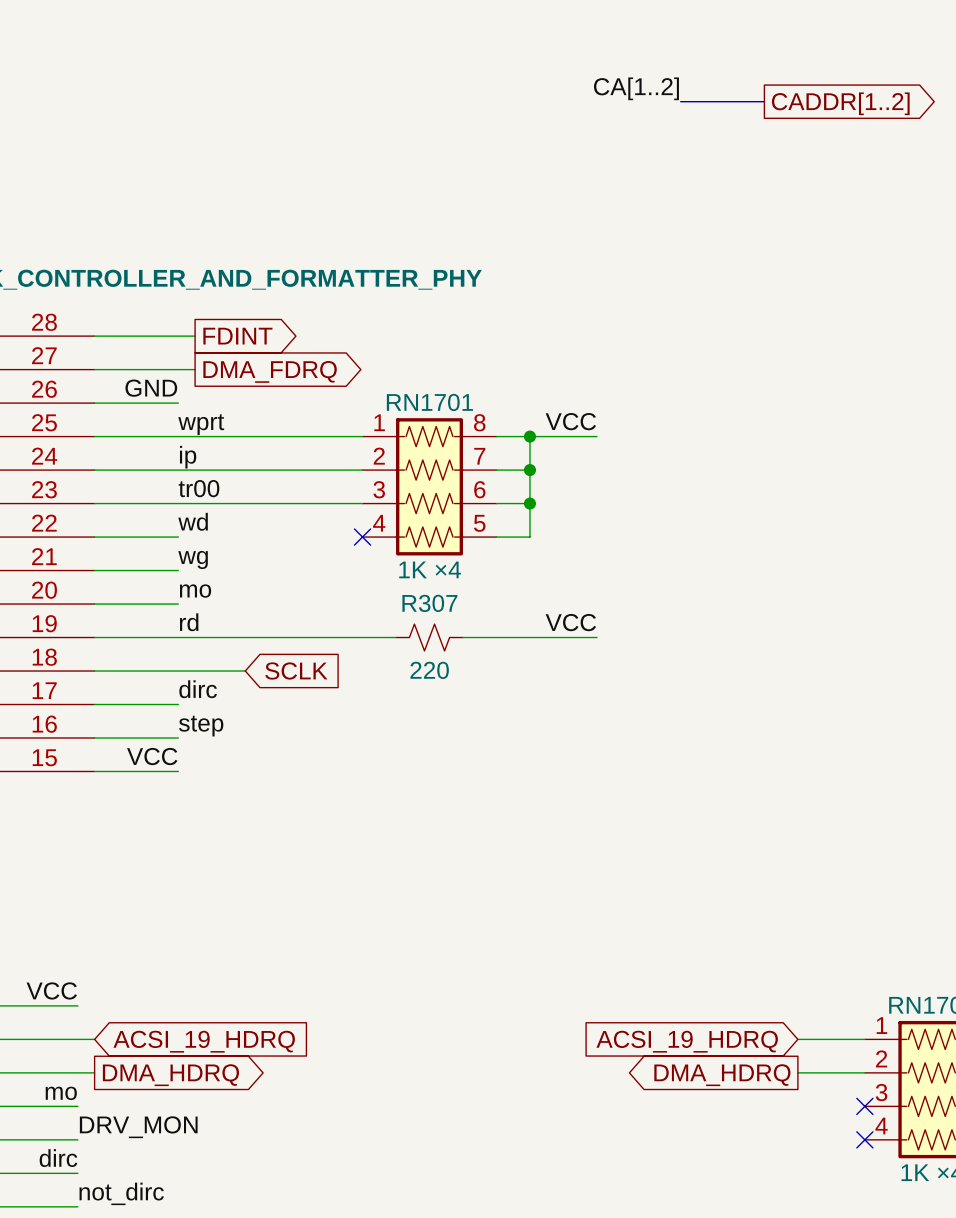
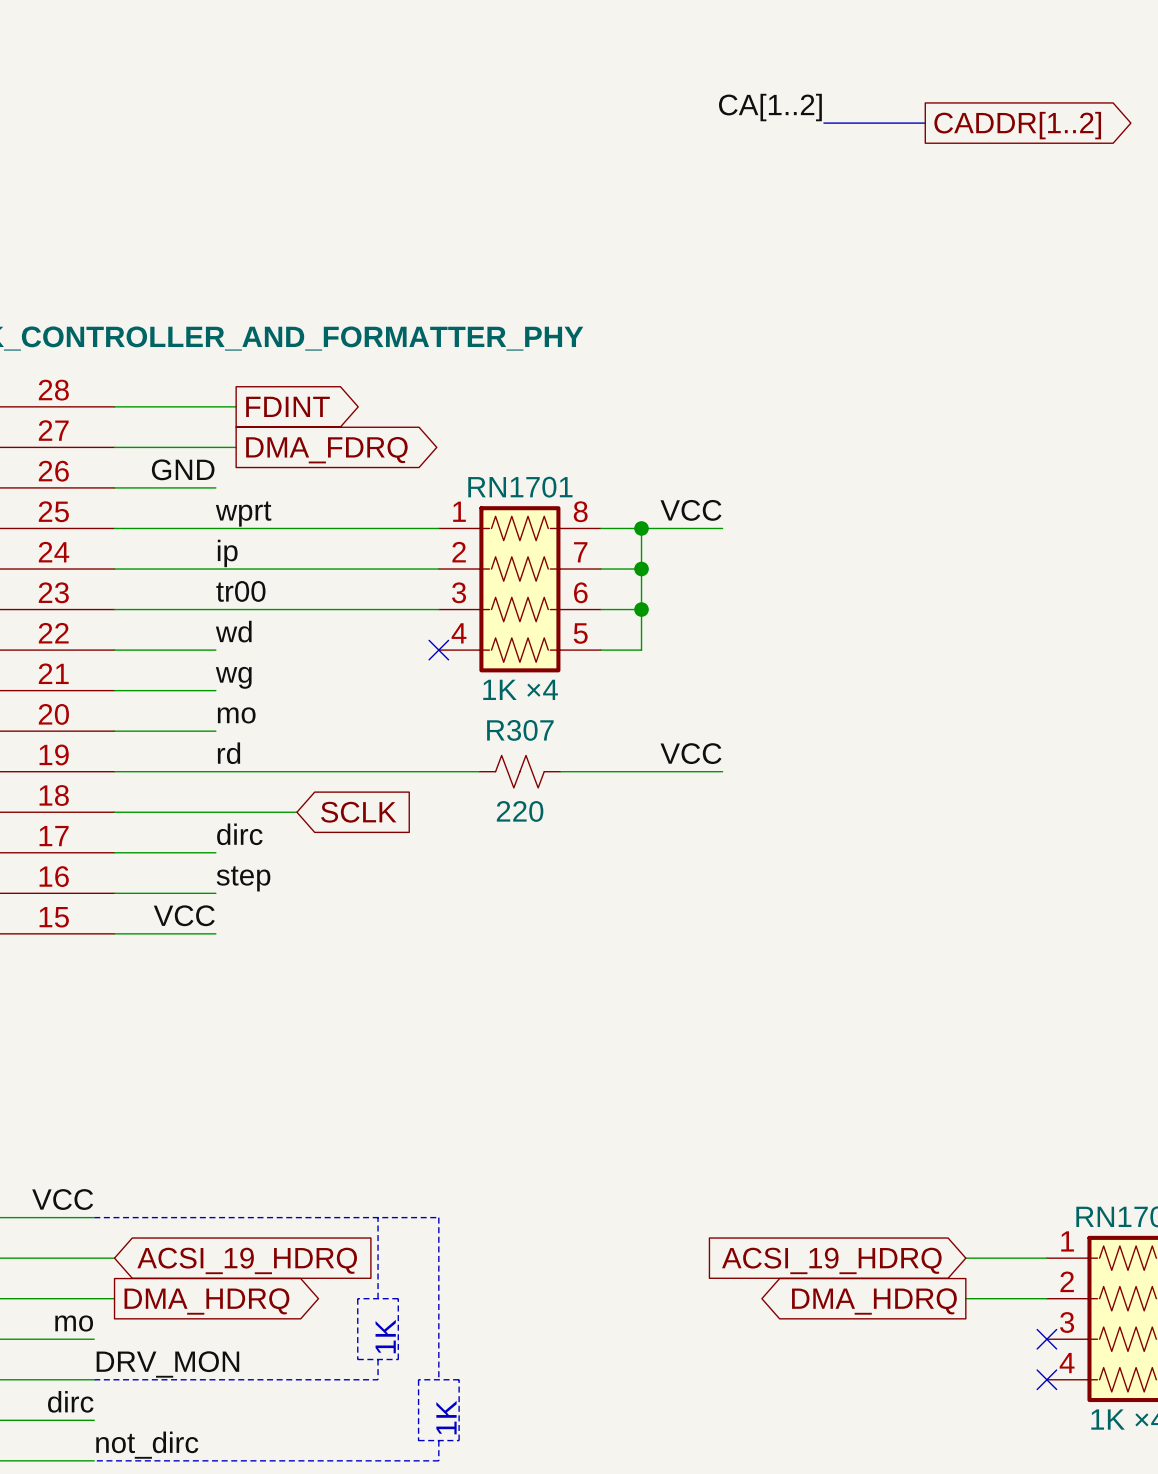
line: none -> (94, 1217) (438, 1217) (438, 1379)
line: none -> (378, 1217) (378, 1298)
line: none -> (357, 1298) (398, 1298) (398, 1359) (357, 1359) (357, 1298)
text: none -> 1K (385, 1336)
line: none -> (378, 1359) (378, 1379) (94, 1379)
line: none -> (418, 1379) (459, 1379) (459, 1440) (418, 1440) (418, 1379)
text: none -> 1K (446, 1417)
line: none -> (438, 1440) (438, 1460) (94, 1460)

